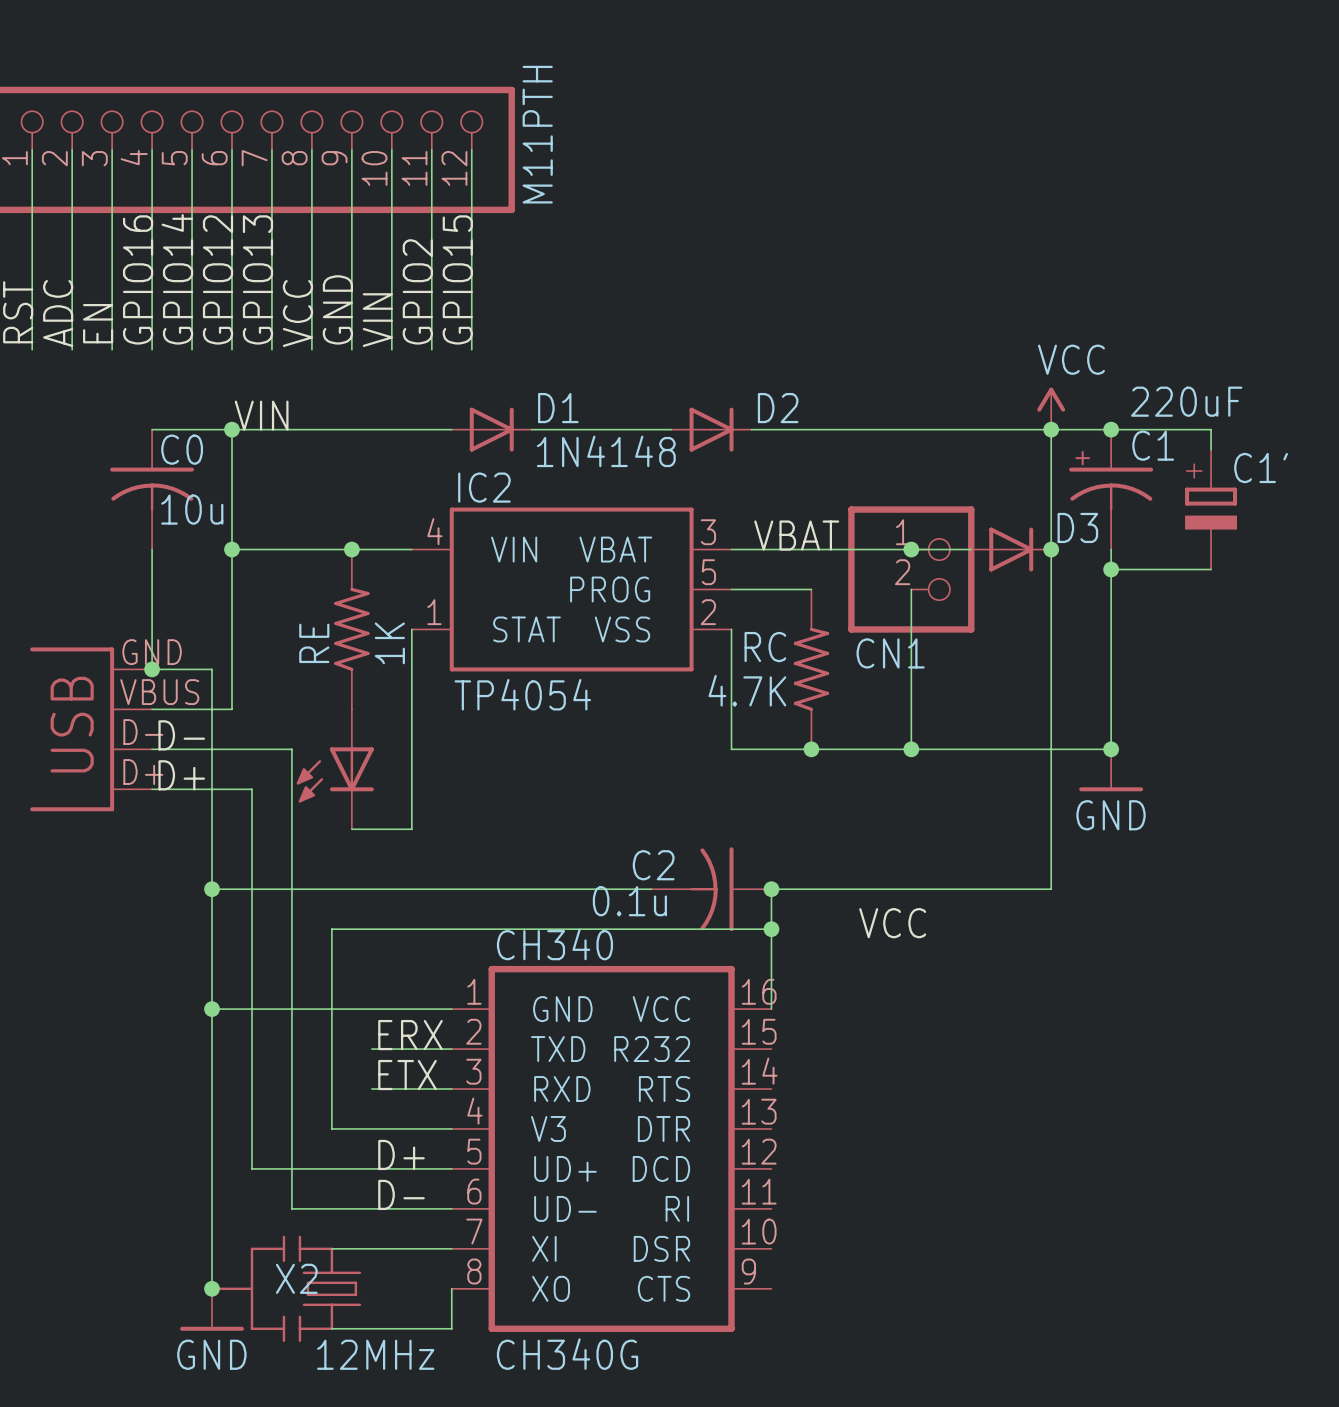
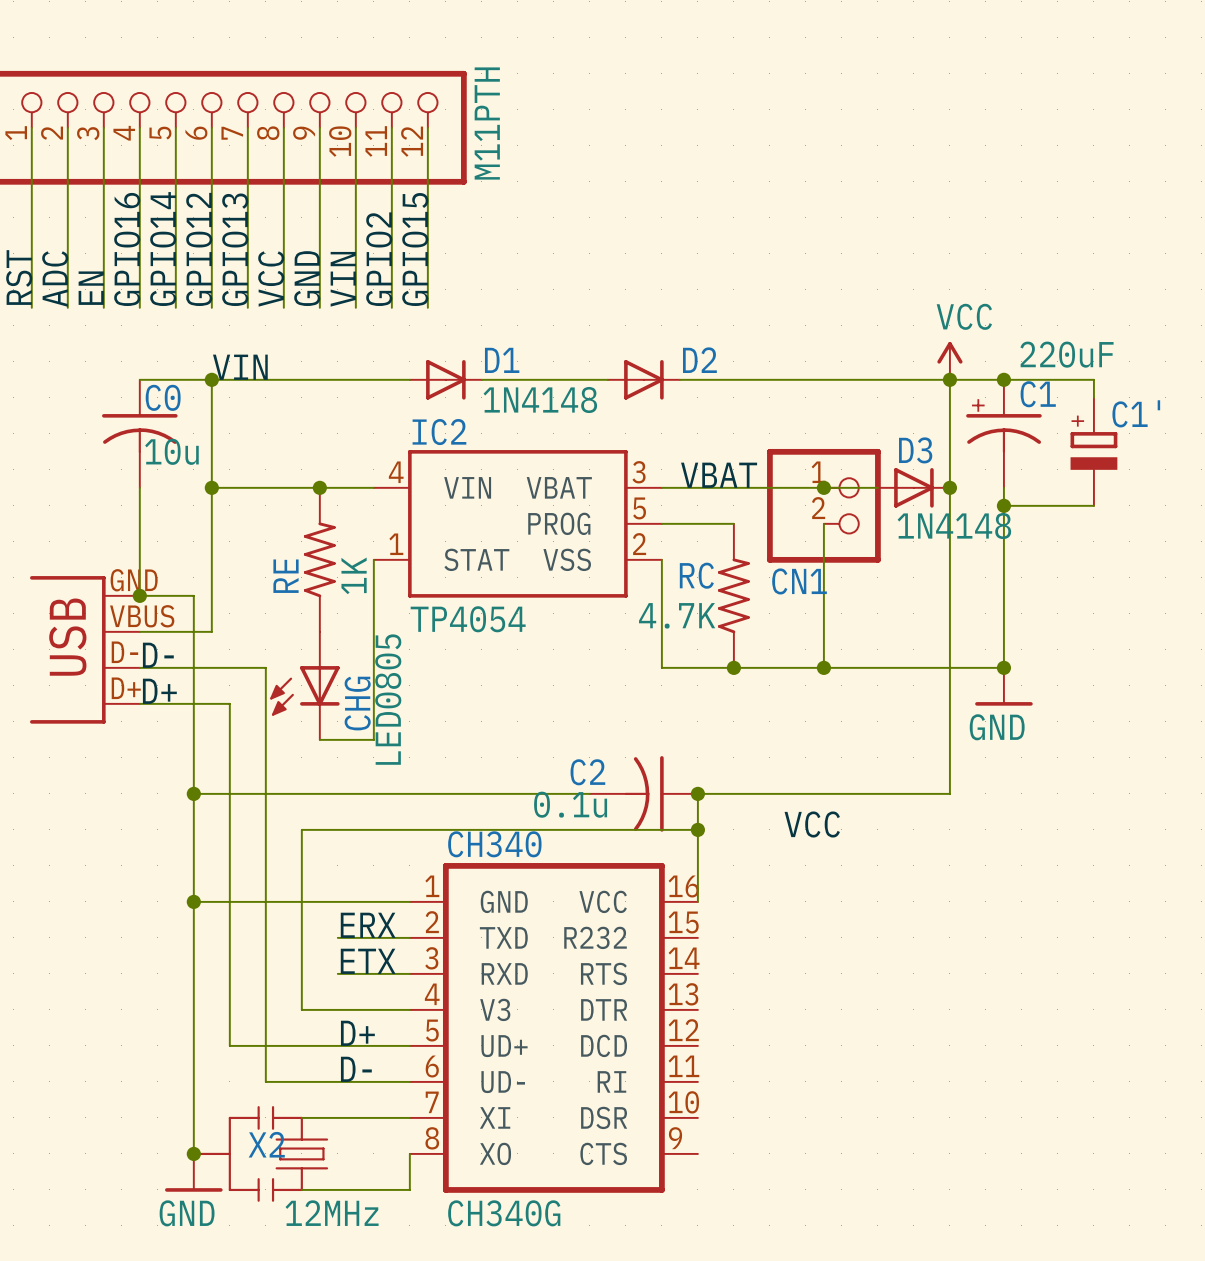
D3 name position: D3 (1077, 527) -> D3 (915, 450)
D3 value: none -> 1N4148 (954, 526)
CHG value: none -> LED0805 (388, 699)
CHG name: none -> CHG (357, 703)

